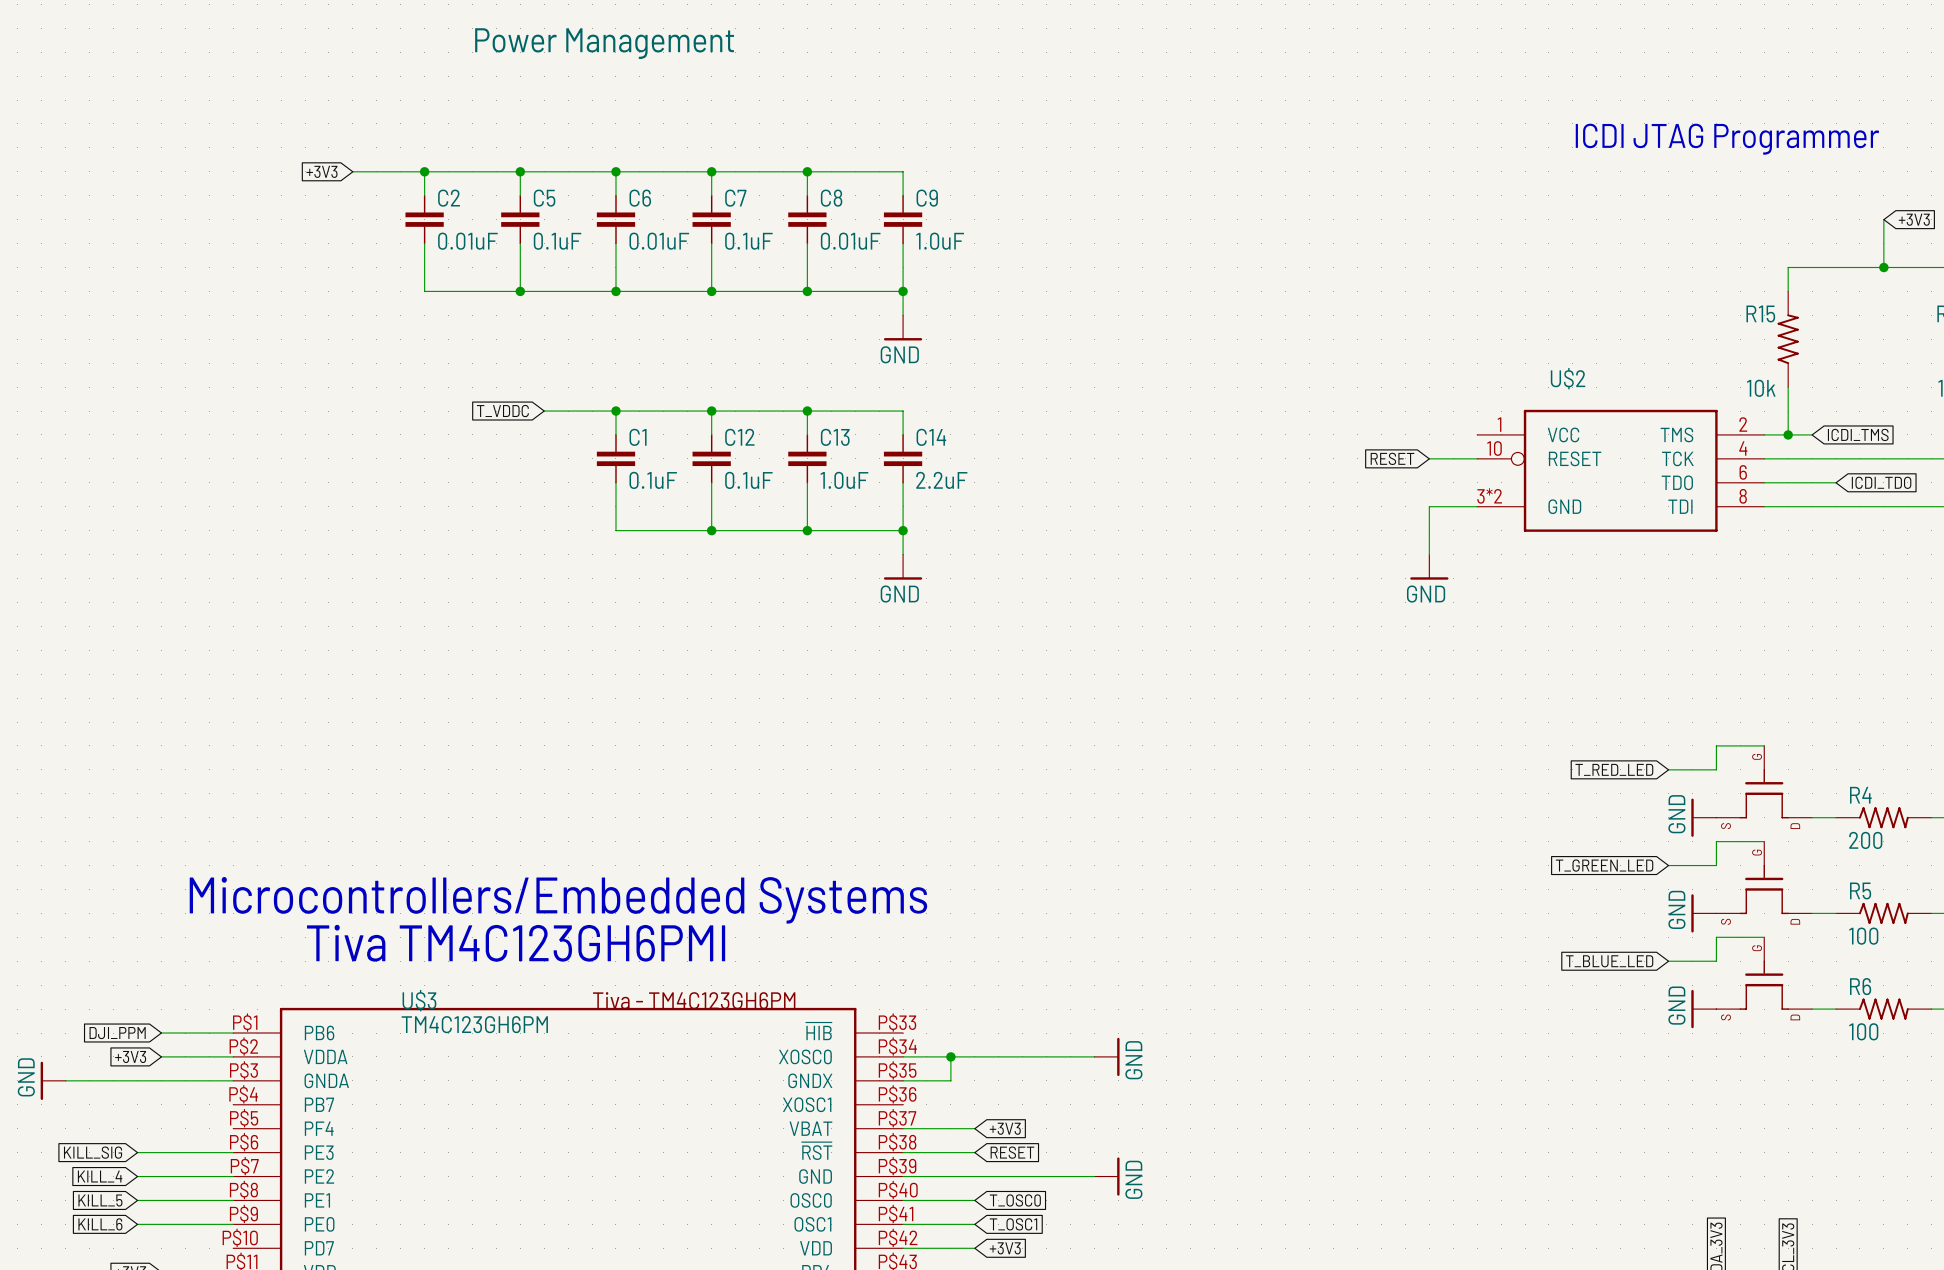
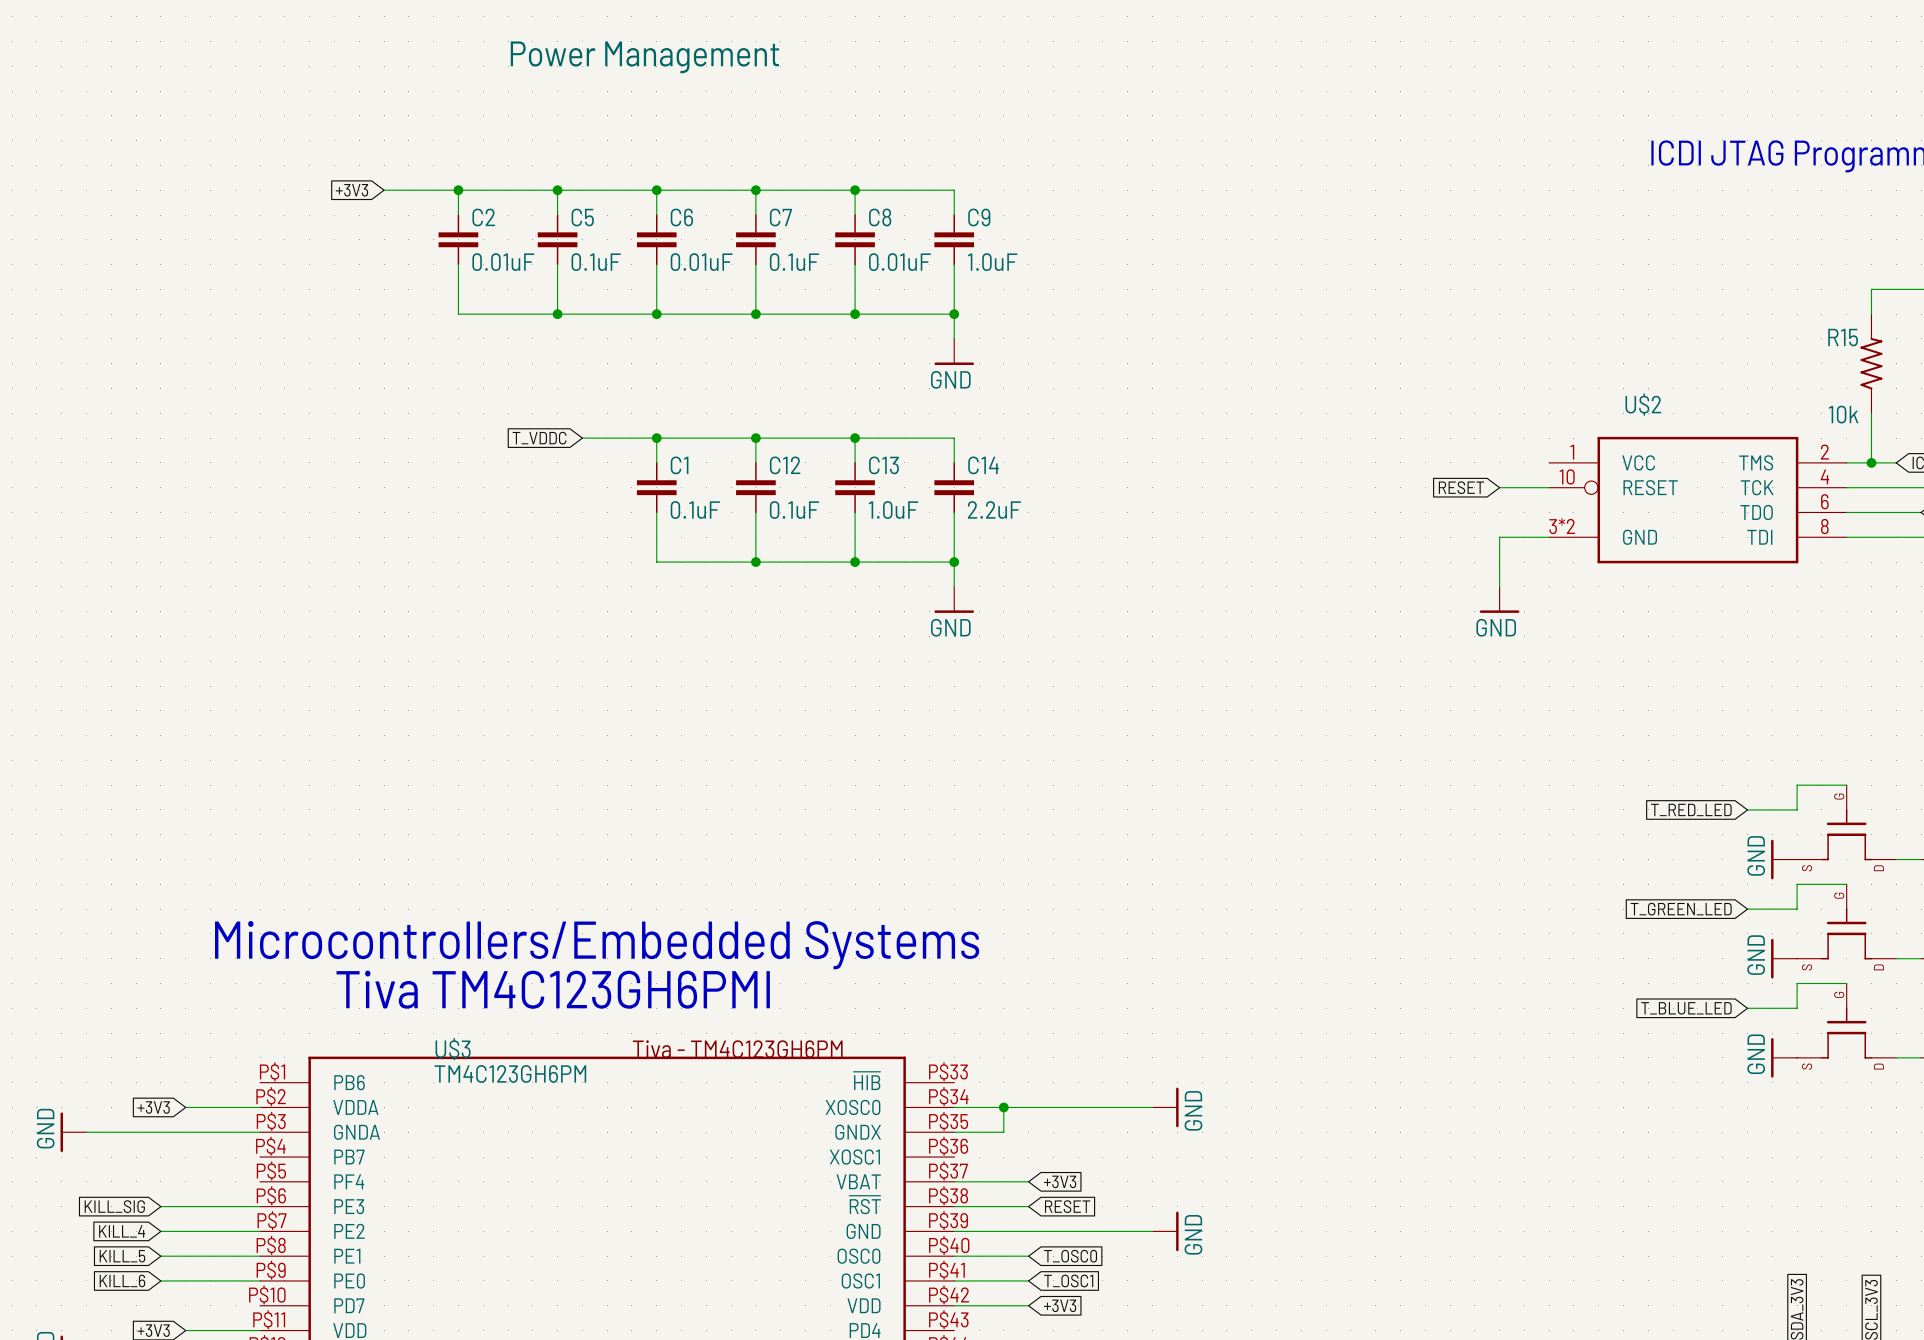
global label: DJI_PPM (117, 1033) -> none
wire: (161, 1033) (233, 1033) -> none

